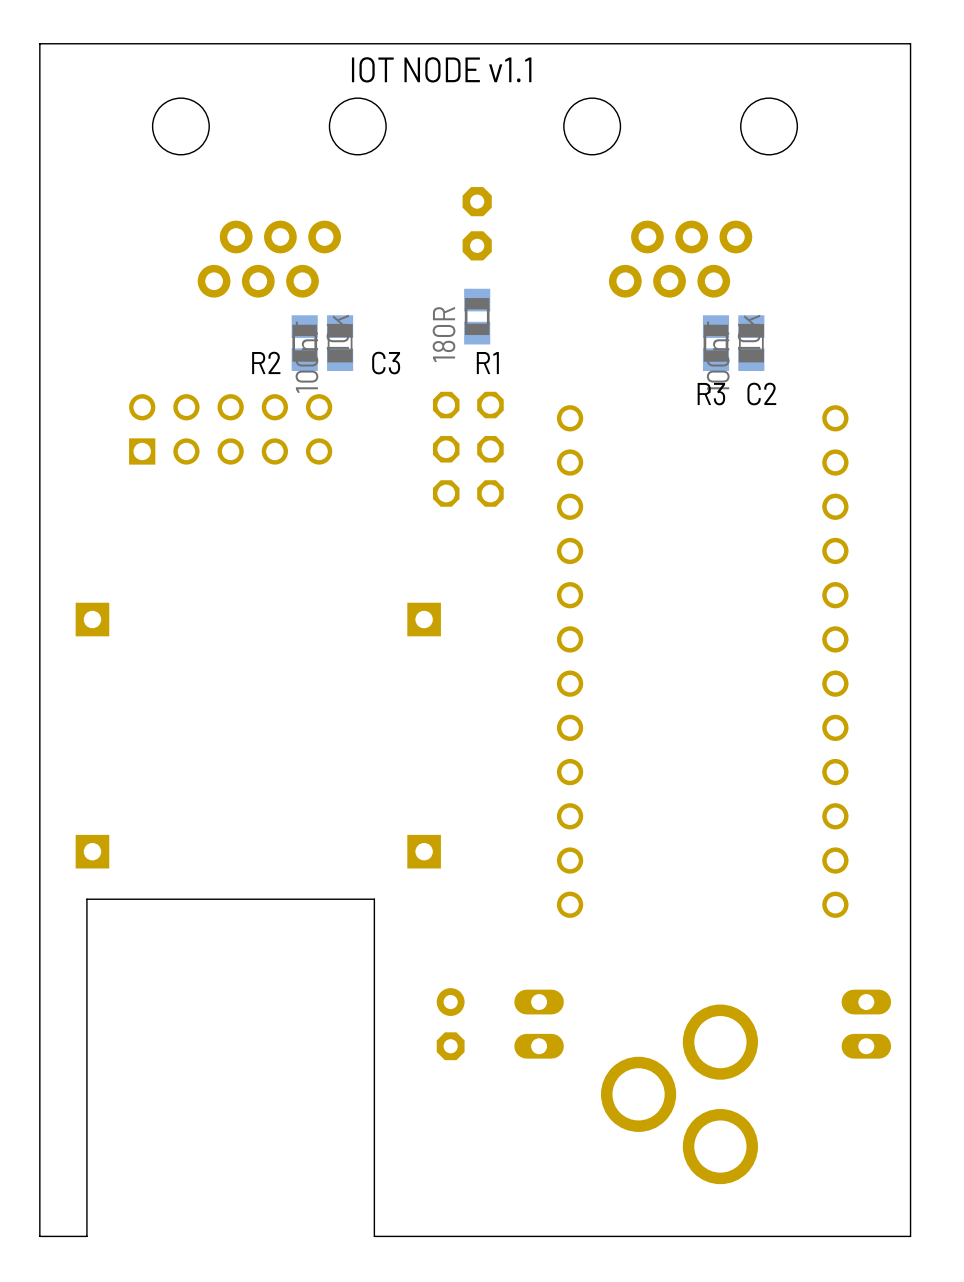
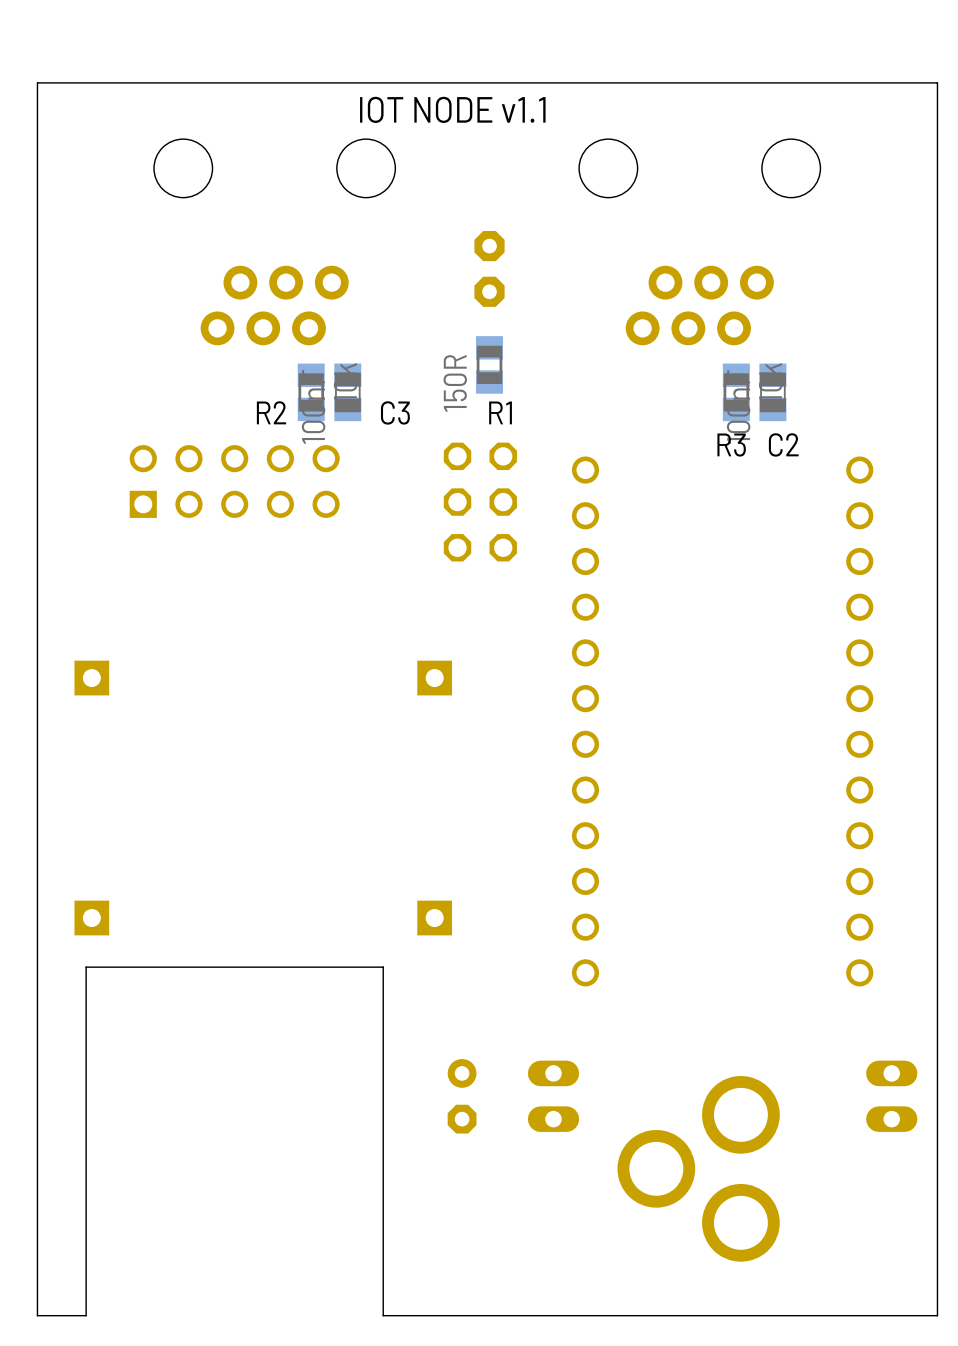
R1 value: 180R (444, 334) -> 150R (455, 383)

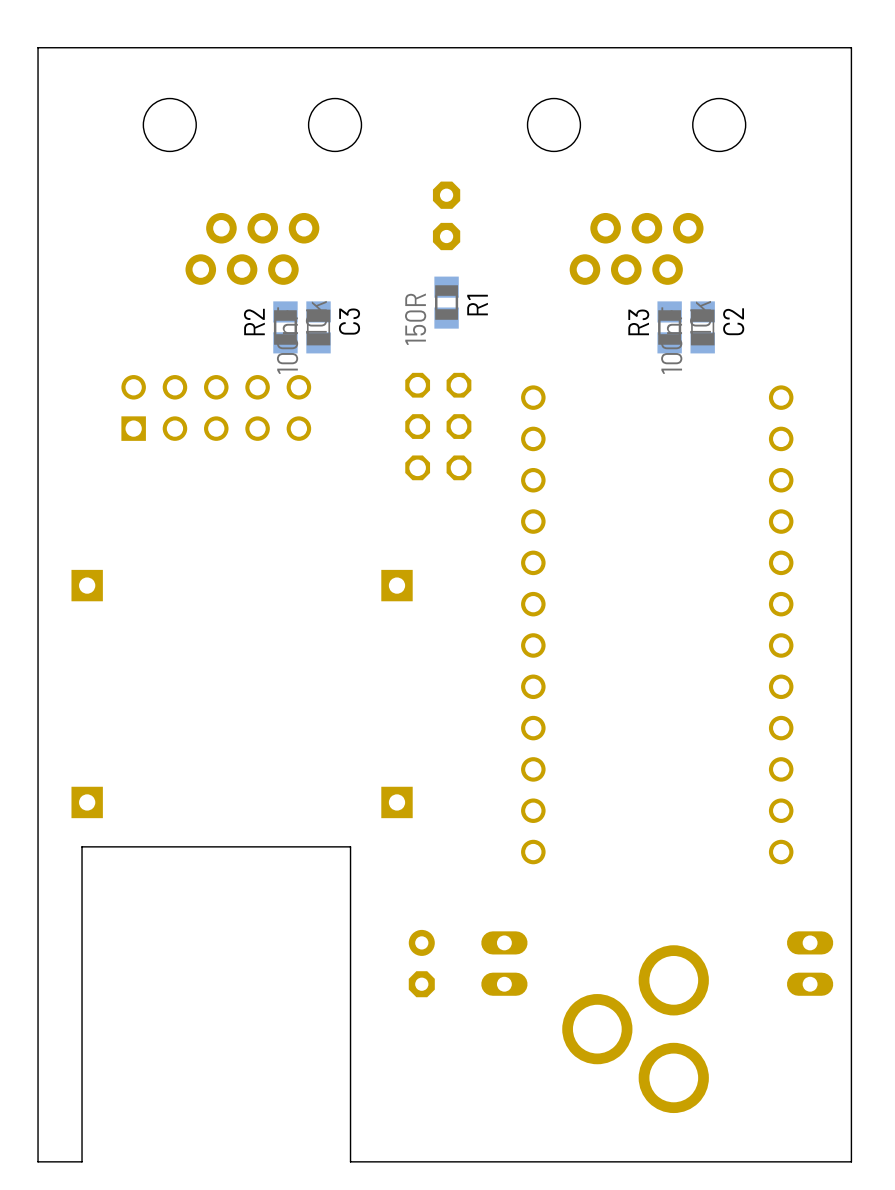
text: IOT NODE v1.1 (452, 109) -> none
R2 name rotation: 0° (271, 412) -> 90° counterclockwise (254, 322)
C3 name rotation: 0° (395, 412) -> 90° counterclockwise (349, 321)
R1 name rotation: 0° (500, 412) -> 90° counterclockwise (477, 305)
C2 name rotation: 0° (783, 444) -> 90° counterclockwise (733, 321)
C2 name position: C2 (783, 444) -> C2 (733, 321)
R3 name rotation: 0° (731, 445) -> 90° counterclockwise (638, 322)
R3 name position: R3 (731, 445) -> R3 (638, 322)

